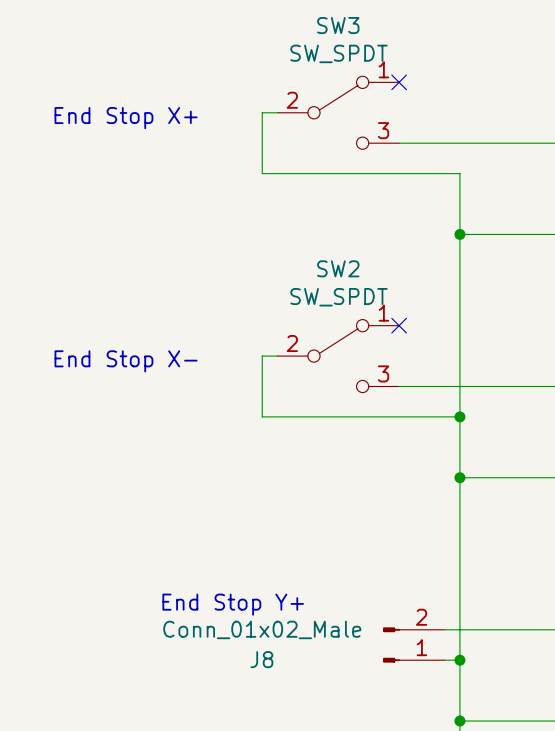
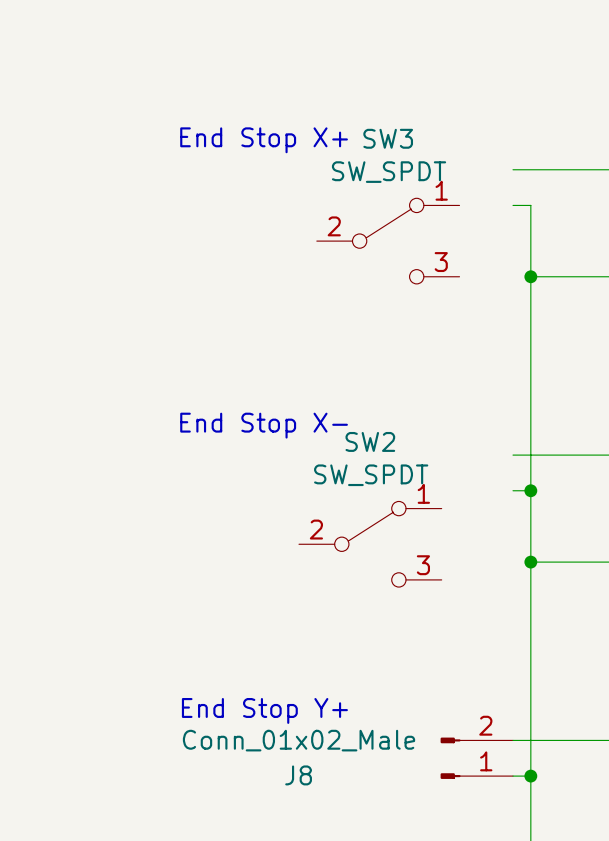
no-connect mark: (399, 82) -> none
wire: (277, 112) (262, 112) (262, 173) (444, 173) -> none
SW3 position: (338, 112) -> (388, 241)
text position: End Stop X+ (126, 118) -> End Stop X+ (264, 140)
wire: (399, 143) (444, 143) -> none
no-connect mark: (399, 325) -> none
wire: (277, 356) (262, 356) (262, 416) (444, 416) -> none
SW2 position: (338, 356) -> (370, 544)
text position: End Stop X- (126, 361) -> End Stop X- (264, 425)
wire: (399, 386) (444, 386) -> none

